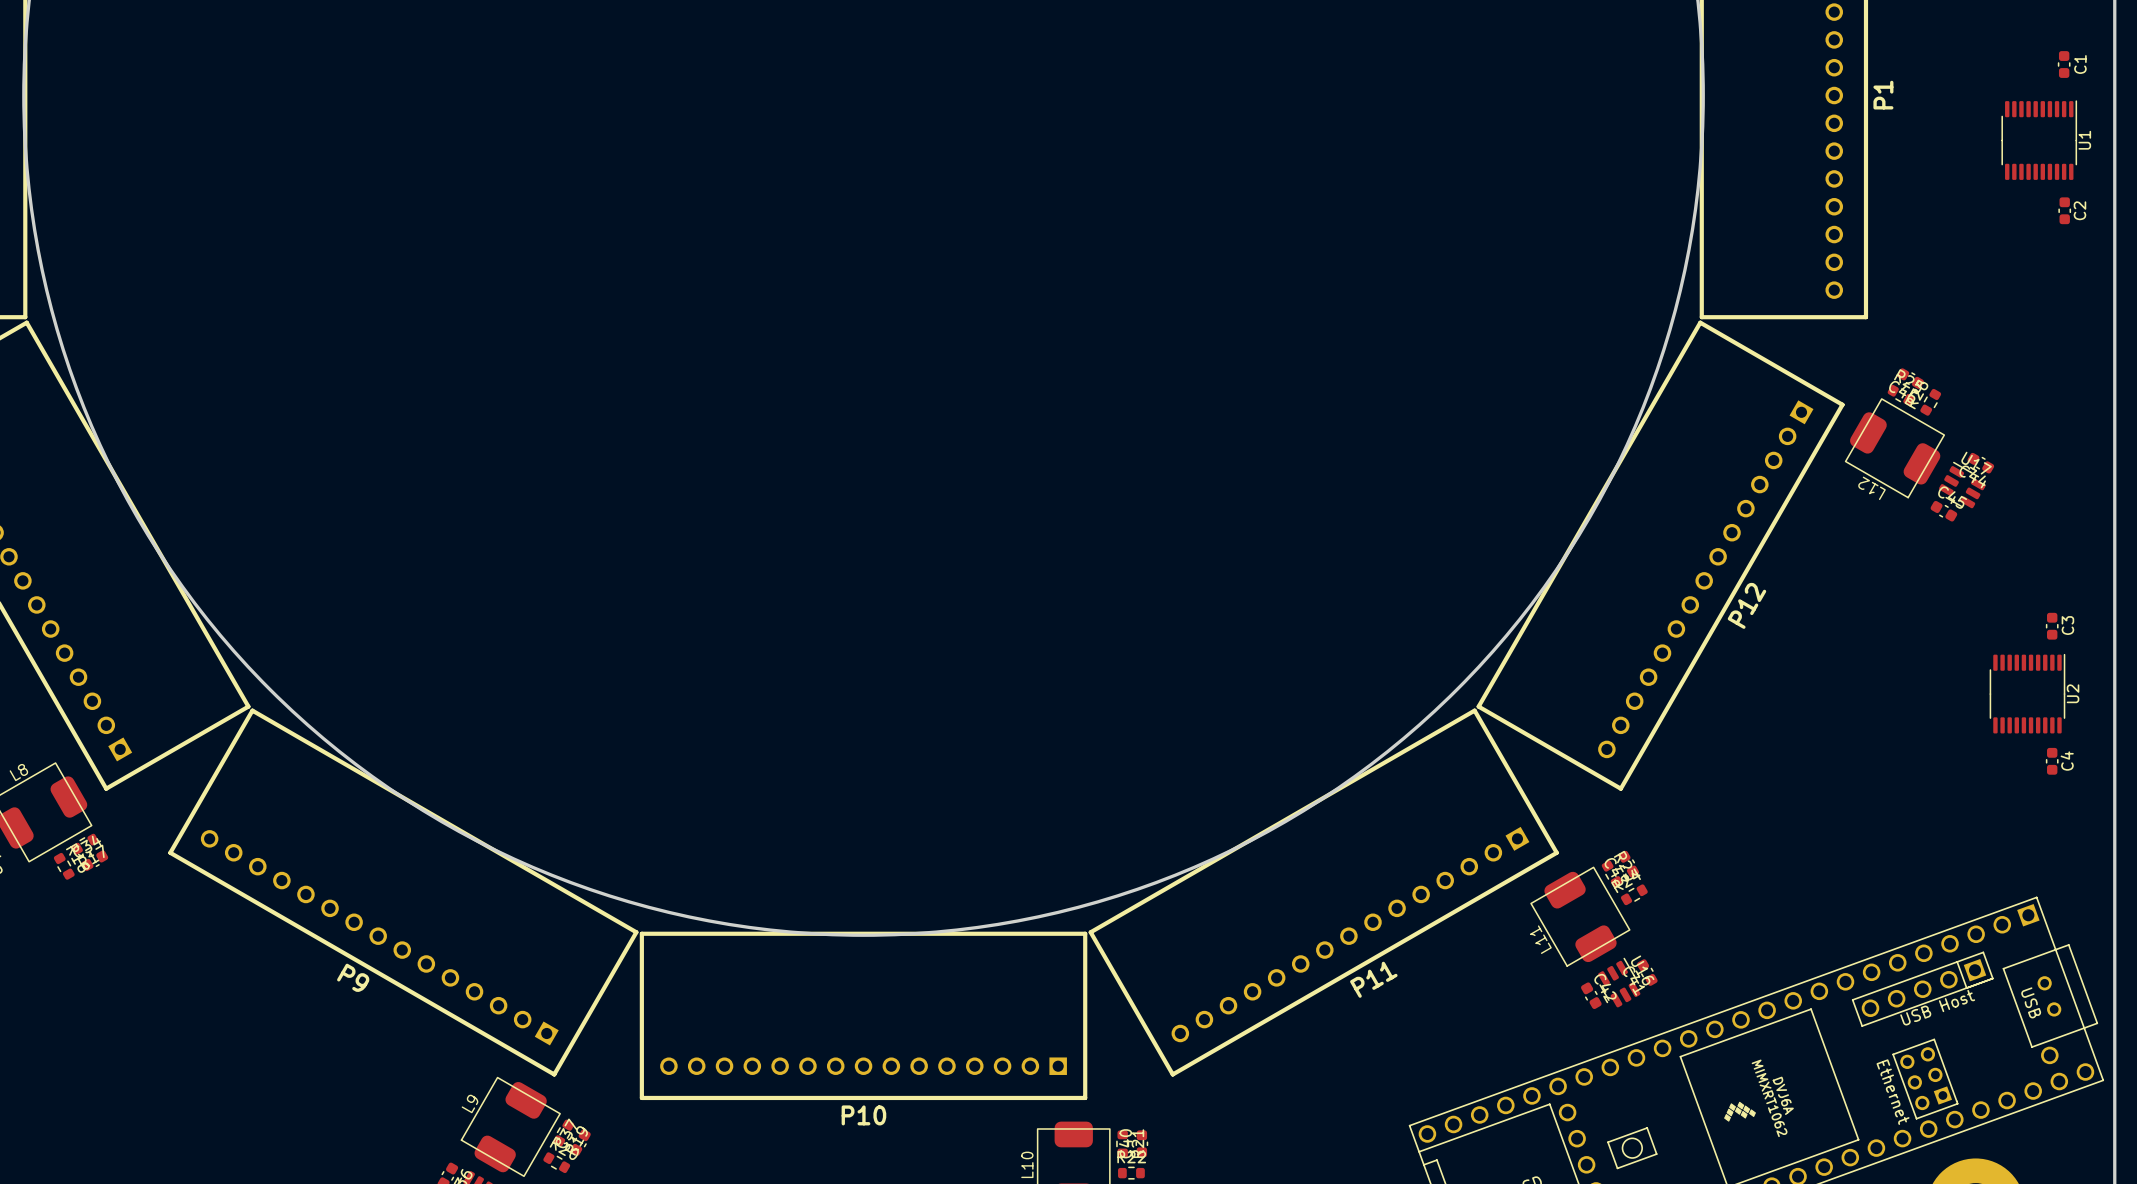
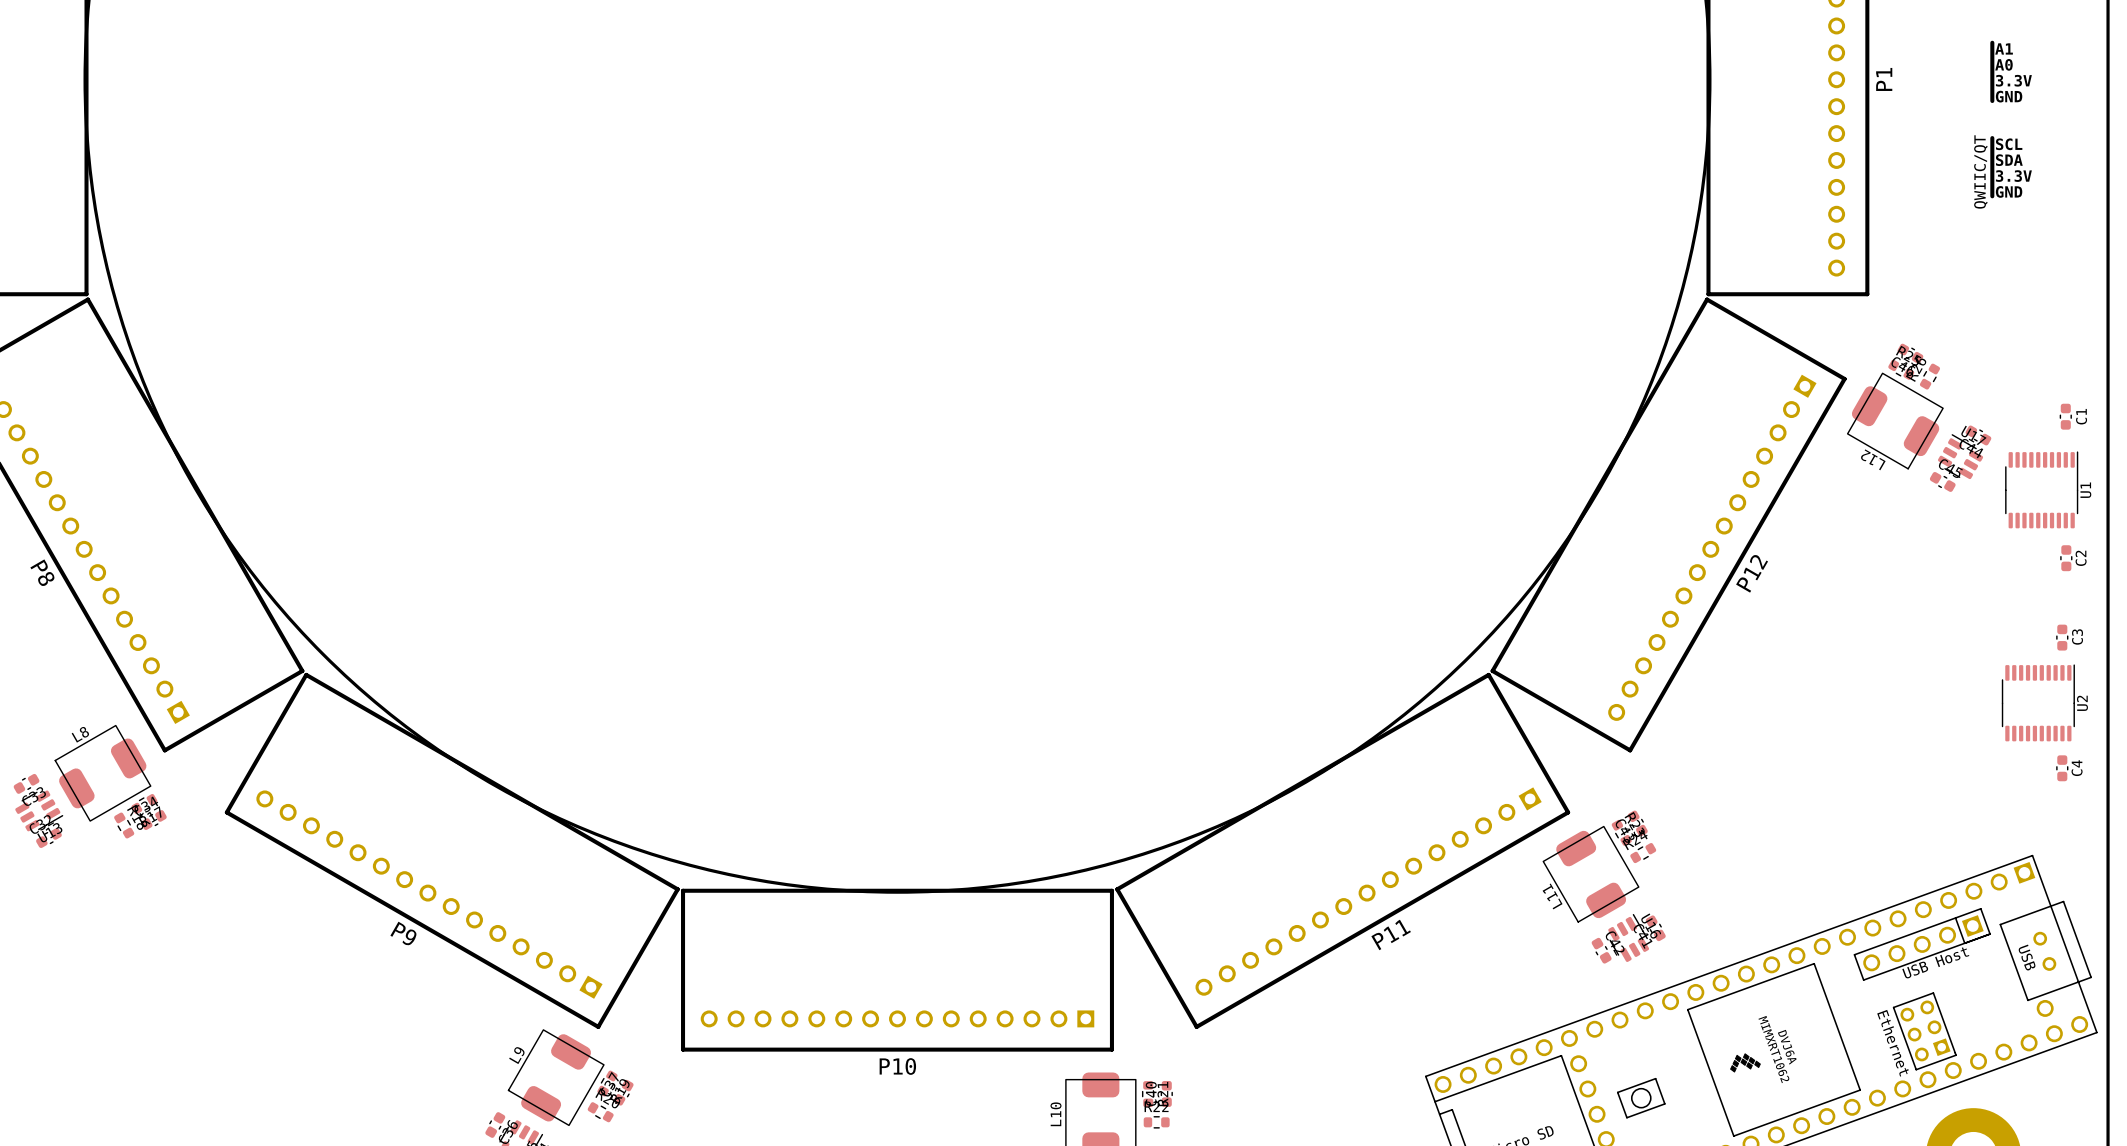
line: none -> (1992, 42) (1992, 101)
text: none -> A1 (2004, 48)
C1 position: (2064, 64) -> (2065, 416)
text: none -> A0 (2003, 64)
text: none -> 3.3V (2013, 80)
text: none -> GND (2009, 96)
U1 position: (2039, 140) -> (2041, 489)
line: none -> (1992, 138) (1992, 196)
text: none -> SCL (2009, 144)
text: none -> SDA (2009, 160)
text: none -> QWIIC/QT (1980, 171)
text: none -> 3.3V (2013, 176)
C2 position: (2064, 210) -> (2066, 558)
text: none -> GND (2009, 191)
C3 position: (2052, 626) -> (2062, 637)
U2 position: (2027, 693) -> (2038, 702)
C4 position: (2052, 761) -> (2062, 768)

